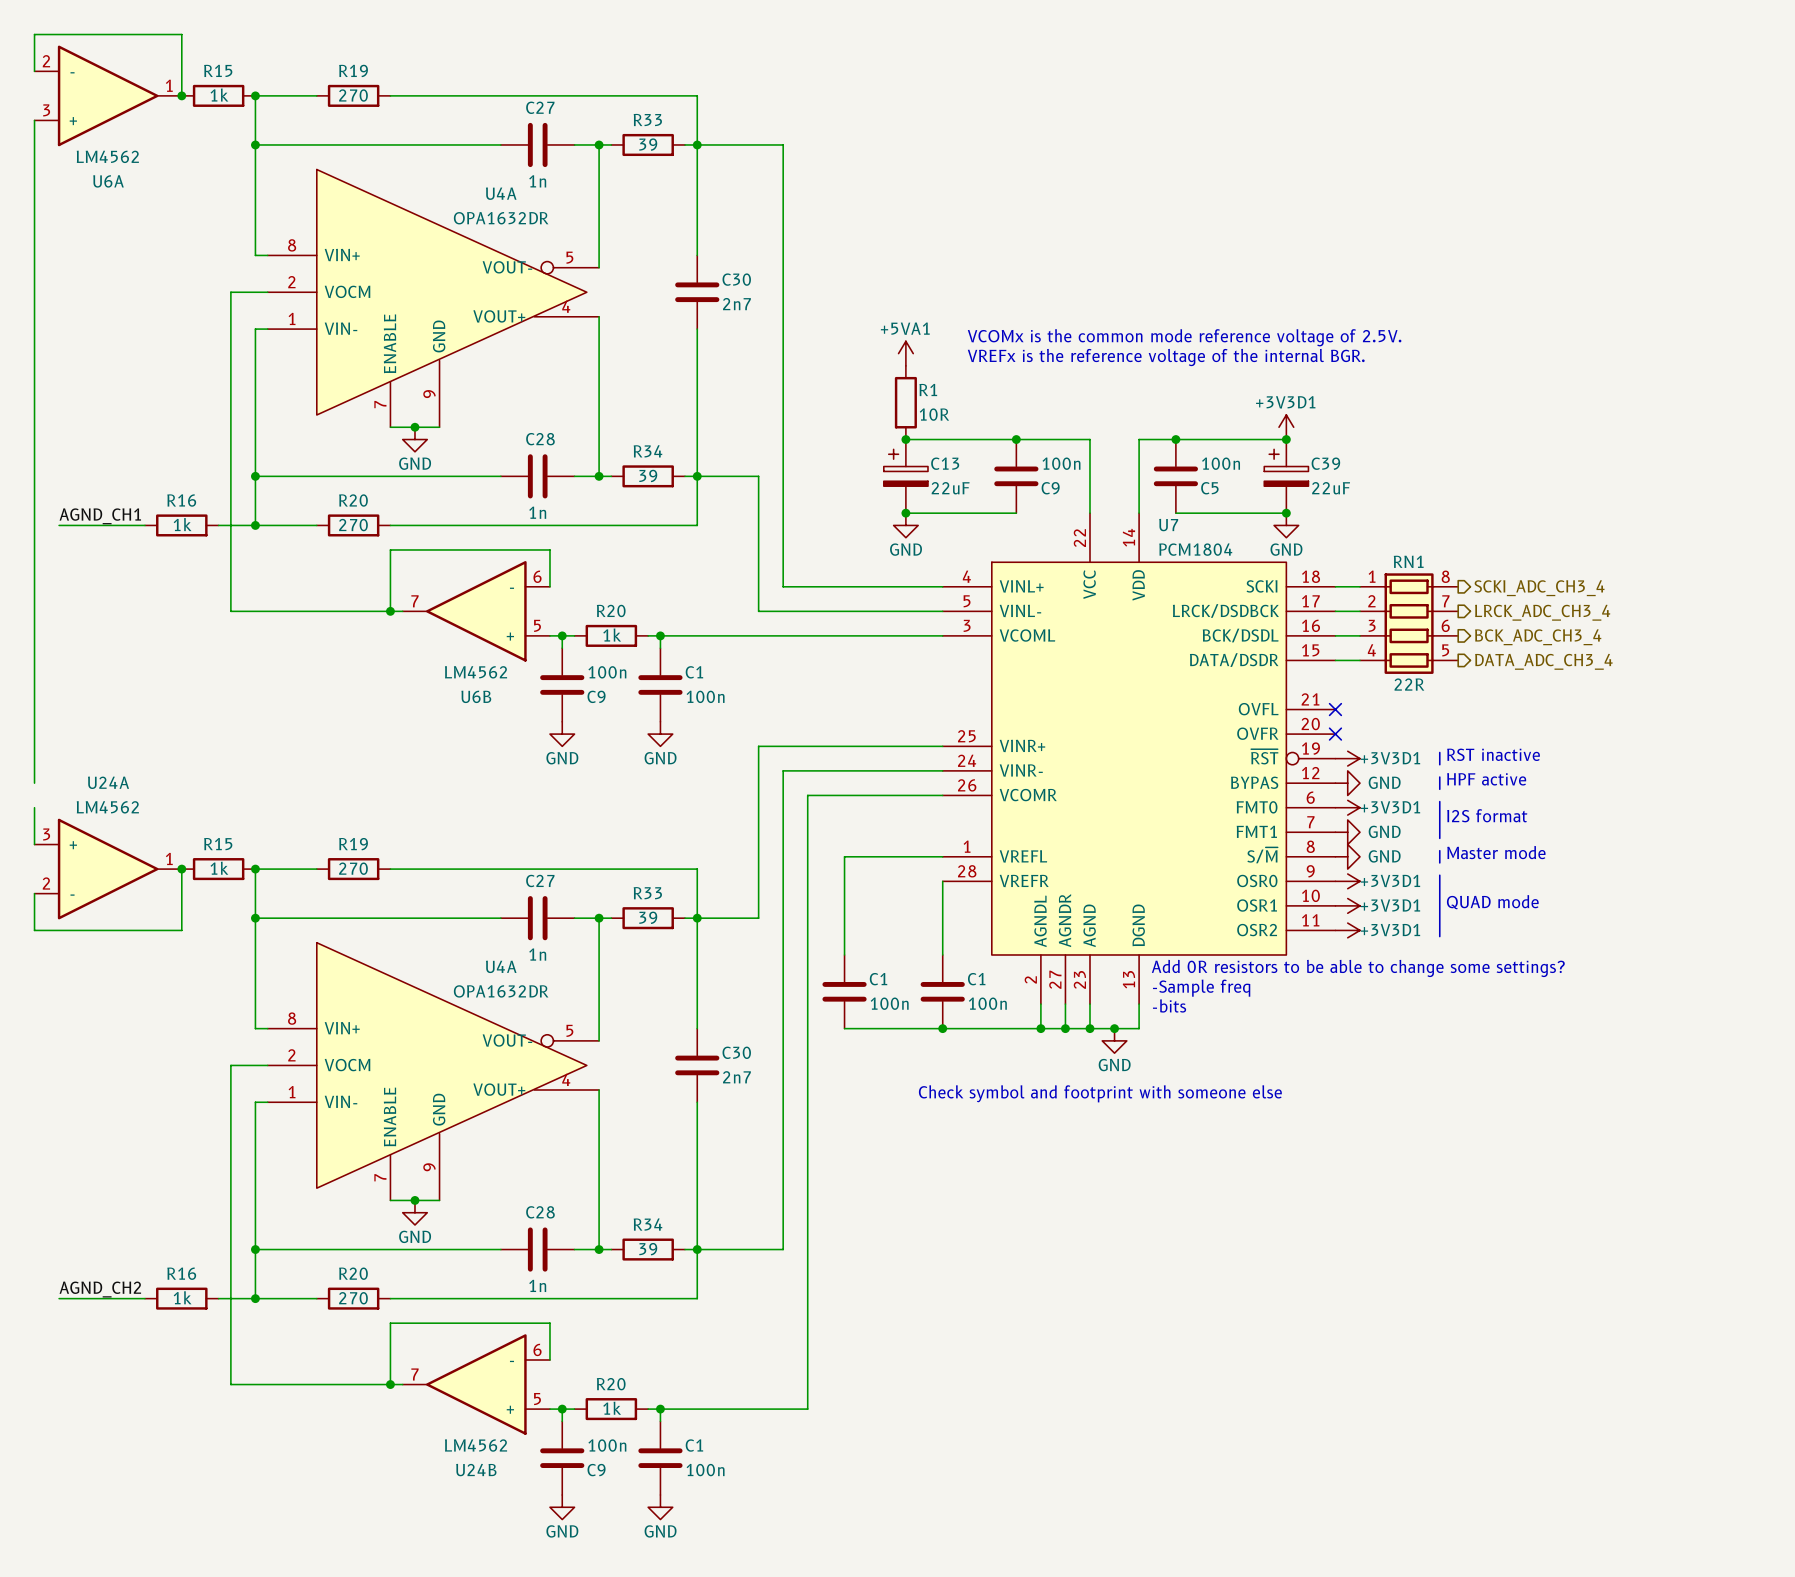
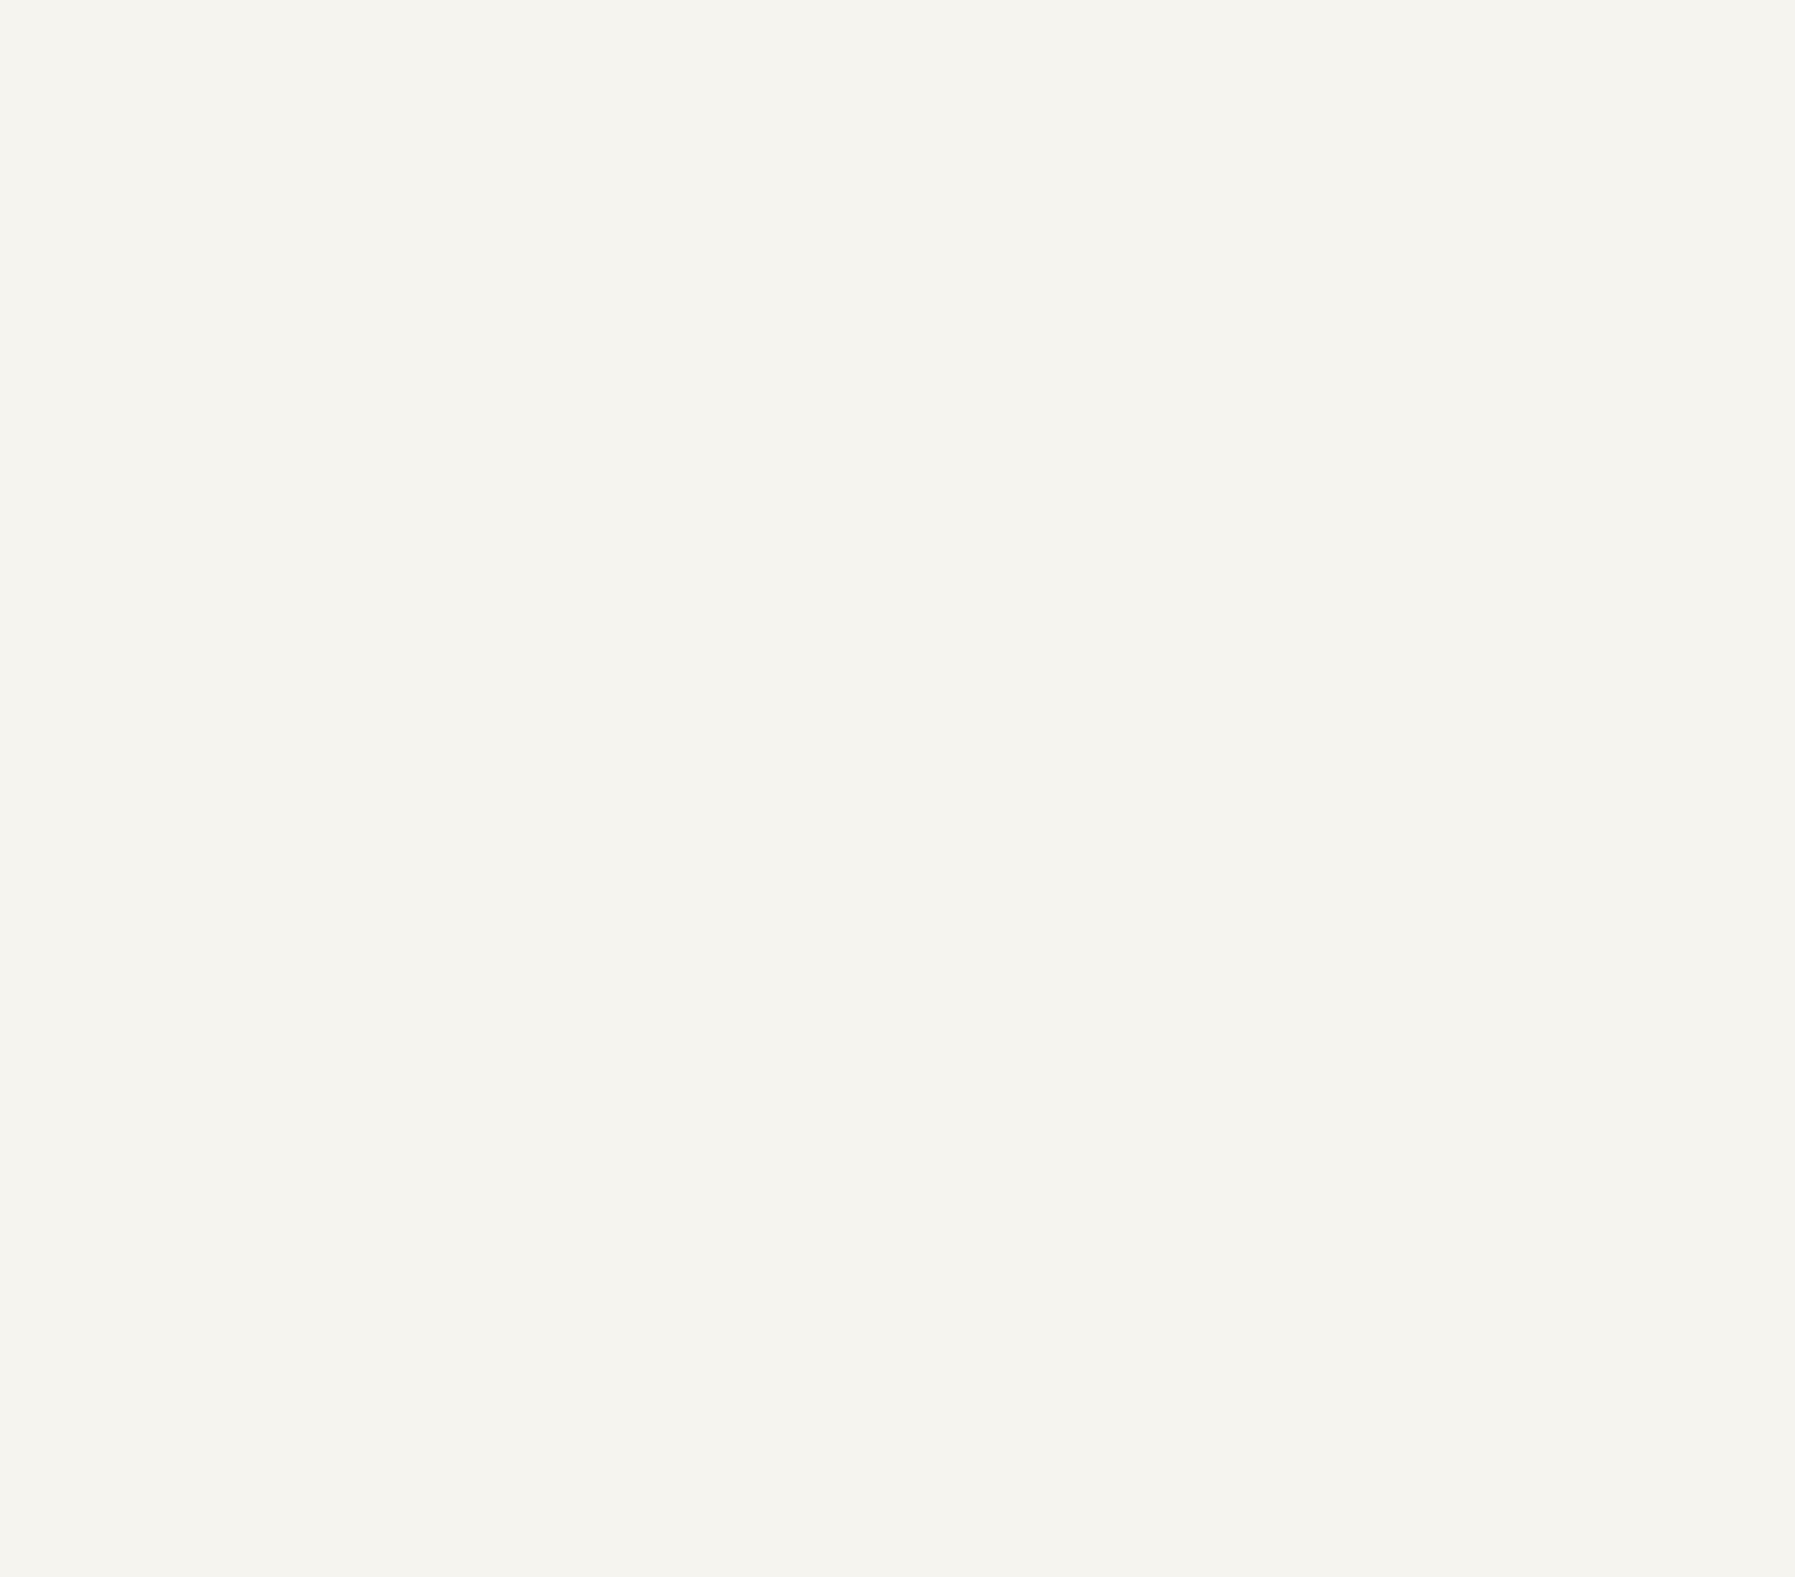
wire: (34, 71) (34, 34) (181, 34) (181, 95) -> none
U6A: LM4562 (108, 95) -> none
junction: (181, 95) -> none
R15: 1k (218, 95) -> none
junction: (255, 95) -> none
wire: (316, 95) (255, 95) (255, 255) (267, 255) -> none
R19: 270 (353, 95) -> none
wire: (390, 95) (697, 95) (697, 255) -> none
wire: (34, 120) (34, 783) -> none
wire: (255, 144) (500, 144) -> none
junction: (255, 144) -> none
C27: 1n (537, 144) -> none
wire: (574, 144) (611, 144) -> none
wire: (599, 144) (599, 267) -> none
junction: (599, 144) -> none
R33: 39 (648, 144) -> none
wire: (684, 144) (783, 144) (783, 586) (942, 586) -> none
junction: (697, 144) -> none
wire: (267, 292) (230, 292) (230, 611) (402, 611) -> none
C30: 2n7 (697, 292) -> none
U4A: OPA1632DR (433, 298) -> none
wire: (599, 316) (599, 476) -> none
wire: (267, 329) (255, 329) (255, 525) -> none
wire: (697, 329) (697, 525) (390, 525) -> none
text: VCOMx is the common mode reference voltage of 2.5V. (1184, 337) -> none
power symbol: +5VA1 (905, 353) -> none
text: VREFx is the reference voltage of the internal BGR. (1166, 357) -> none
R1: 10R (905, 402) -> none
wire: (390, 427) (439, 427) -> none
junction: (414, 427) -> none
power symbol: +3V3D1 (1286, 427) -> none
power symbol: GND (414, 439) -> none
wire: (905, 439) (1089, 439) (1089, 513) -> none
junction: (905, 439) -> none
junction: (1016, 439) -> none
junction: (1175, 439) -> none
wire: (1286, 439) (1139, 439) (1139, 513) -> none
junction: (1286, 439) -> none
wire: (255, 476) (500, 476) -> none
junction: (255, 476) -> none
C28: 1n (537, 476) -> none
wire: (574, 476) (611, 476) -> none
junction: (599, 476) -> none
R34: 39 (648, 476) -> none
wire: (684, 476) (758, 476) (758, 611) (942, 611) -> none
junction: (697, 476) -> none
C13: 22uF (905, 476) -> none
C9: 100n (1016, 476) -> none
C5: 100n (1175, 476) -> none
C39: 22uF (1286, 476) -> none
wire: (905, 513) (1016, 513) -> none
junction: (905, 513) -> none
wire: (1175, 513) (1286, 513) -> none
junction: (1286, 513) -> none
label: AGND_CH1 (100, 516) -> none
wire: (59, 525) (144, 525) -> none
R16: 1k (181, 525) -> none
wire: (218, 525) (316, 525) -> none
junction: (255, 525) -> none
R20: 270 (353, 525) -> none
power symbol: GND (905, 525) -> none
power symbol: GND (1286, 525) -> none
wire: (549, 586) (549, 549) (390, 549) (390, 611) -> none
wire: (1335, 586) (1359, 586) -> none
hierarchical label: SCKI_ADC_CH3_4 (1539, 588) -> none
junction: (390, 611) -> none
U6B: LM4562 (476, 611) -> none
wire: (1335, 611) (1359, 611) -> none
hierarchical label: LRCK_ADC_CH3_4 (1542, 612) -> none
RN1: 22R (1409, 623) -> none
wire: (549, 635) (574, 635) -> none
wire: (562, 635) (562, 648) -> none
junction: (562, 635) -> none
R20: 1k (611, 635) -> none
wire: (648, 635) (942, 635) -> none
wire: (660, 635) (660, 648) -> none
junction: (660, 635) -> none
wire: (1335, 635) (1359, 635) -> none
hierarchical label: BCK_ADC_CH3_4 (1538, 637) -> none
wire: (1335, 660) (1359, 660) -> none
hierarchical label: DATA_ADC_CH3_4 (1543, 661) -> none
C9: 100n (562, 684) -> none
C1: 100n (660, 684) -> none
no-connect mark: (1335, 709) -> none
power symbol: GND (562, 734) -> none
power symbol: GND (660, 734) -> none
no-connect mark: (1335, 734) -> none
wire: (942, 746) (758, 746) (758, 918) (684, 918) -> none
line: (1439, 752) (1439, 764) -> none
text: RST inactive (1493, 754) -> none
U7: PCM1804 (1139, 758) -> none
power symbol: +3V3D1 (1347, 758) -> none
wire: (942, 770) (783, 770) (783, 1249) (684, 1249) -> none
line: (1439, 777) (1439, 789) -> none
text: HPF active (1486, 779) -> none
power symbol: GND (1347, 783) -> none
wire: (942, 795) (807, 795) (807, 1409) (648, 1409) -> none
line: (1439, 801) (1439, 838) -> none
wire: (34, 807) (34, 844) -> none
power symbol: +3V3D1 (1347, 807) -> none
text: I2S format (1487, 815) -> none
power symbol: GND (1347, 832) -> none
line: (1439, 850) (1439, 862) -> none
text: Master mode (1496, 852) -> none
wire: (942, 856) (844, 856) (844, 954) -> none
power symbol: GND (1347, 856) -> none
U24A: LM4562 (108, 869) -> none
wire: (181, 869) (181, 930) (34, 930) (34, 893) -> none
junction: (181, 869) -> none
R15: 1k (218, 869) -> none
junction: (255, 869) -> none
wire: (316, 869) (255, 869) (255, 1028) (267, 1028) -> none
R19: 270 (353, 869) -> none
wire: (390, 869) (697, 869) (697, 1028) -> none
line: (1439, 875) (1439, 936) -> none
wire: (942, 881) (942, 954) -> none
power symbol: +3V3D1 (1347, 881) -> none
text: QUAD mode (1492, 902) -> none
power symbol: +3V3D1 (1347, 905) -> none
wire: (255, 918) (500, 918) -> none
junction: (255, 918) -> none
C27: 1n (537, 918) -> none
wire: (574, 918) (611, 918) -> none
wire: (599, 918) (599, 1040) -> none
junction: (599, 918) -> none
R33: 39 (648, 918) -> none
junction: (697, 918) -> none
power symbol: +3V3D1 (1347, 930) -> none
text: Add 0R resistors to be able to change some settings? (1358, 968) -> none
text: -Sample freq (1201, 988) -> none
C1: 100n (844, 991) -> none
C1: 100n (942, 991) -> none
wire: (1040, 1004) (1040, 1028) -> none
wire: (1065, 1004) (1065, 1028) -> none
wire: (1089, 1004) (1089, 1028) -> none
wire: (1139, 1004) (1139, 1028) (844, 1028) -> none
text: -bits (1169, 1005) -> none
junction: (942, 1028) -> none
junction: (1040, 1028) -> none
junction: (1065, 1028) -> none
junction: (1089, 1028) -> none
junction: (1114, 1028) -> none
power symbol: GND (1114, 1040) -> none
wire: (267, 1065) (230, 1065) (230, 1384) (402, 1384) -> none
C30: 2n7 (697, 1065) -> none
U4A: OPA1632DR (433, 1071) -> none
wire: (599, 1089) (599, 1249) -> none
text: Check symbol and footprint with someone else (1100, 1093) -> none
wire: (267, 1102) (255, 1102) (255, 1298) -> none
wire: (697, 1102) (697, 1298) (390, 1298) -> none
wire: (390, 1200) (439, 1200) -> none
junction: (414, 1200) -> none
power symbol: GND (414, 1212) -> none
wire: (255, 1249) (500, 1249) -> none
junction: (255, 1249) -> none
C28: 1n (537, 1249) -> none
wire: (574, 1249) (611, 1249) -> none
junction: (599, 1249) -> none
R34: 39 (648, 1249) -> none
junction: (697, 1249) -> none
label: AGND_CH2 (100, 1289) -> none
wire: (59, 1298) (144, 1298) -> none
R16: 1k (181, 1298) -> none
wire: (218, 1298) (316, 1298) -> none
junction: (255, 1298) -> none
R20: 270 (353, 1298) -> none
wire: (549, 1359) (549, 1323) (390, 1323) (390, 1384) -> none
junction: (390, 1384) -> none
U24B: LM4562 (476, 1384) -> none
wire: (549, 1409) (574, 1409) -> none
wire: (562, 1409) (562, 1421) -> none
junction: (562, 1409) -> none
R20: 1k (611, 1409) -> none
wire: (660, 1409) (660, 1421) -> none
junction: (660, 1409) -> none
C9: 100n (562, 1458) -> none
C1: 100n (660, 1458) -> none
power symbol: GND (562, 1507) -> none
power symbol: GND (660, 1507) -> none

